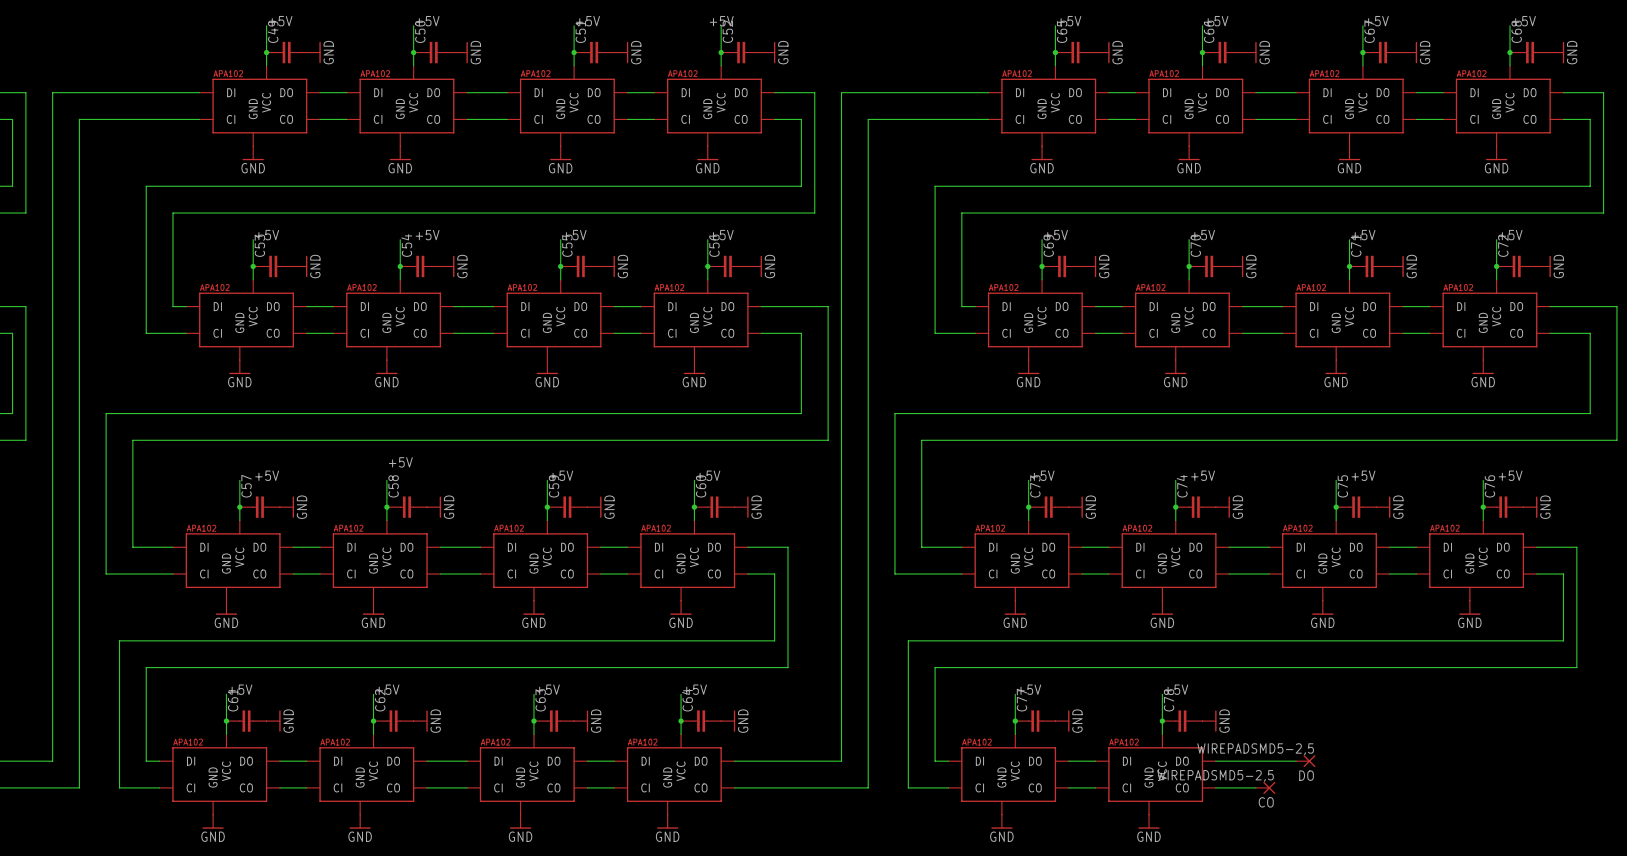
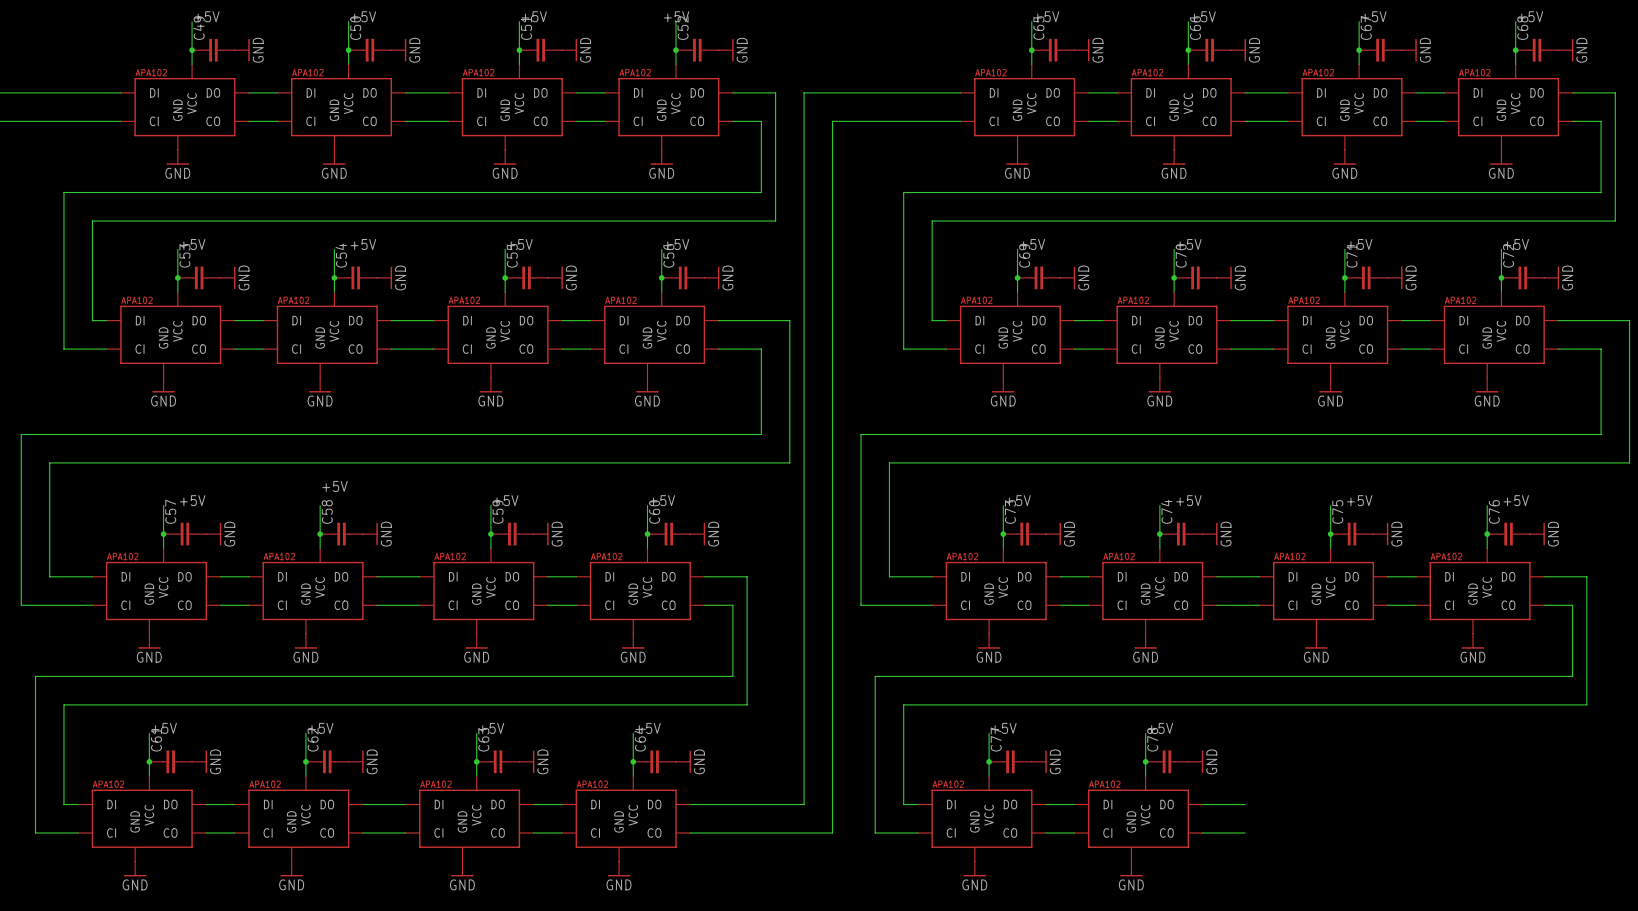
wire: (1255, 761) (1296, 761) -> none
DO: WIREPADSMD5-2,5 (1305, 761) -> none
CO: WIREPADSMD5-2,5 (1265, 787) -> none

